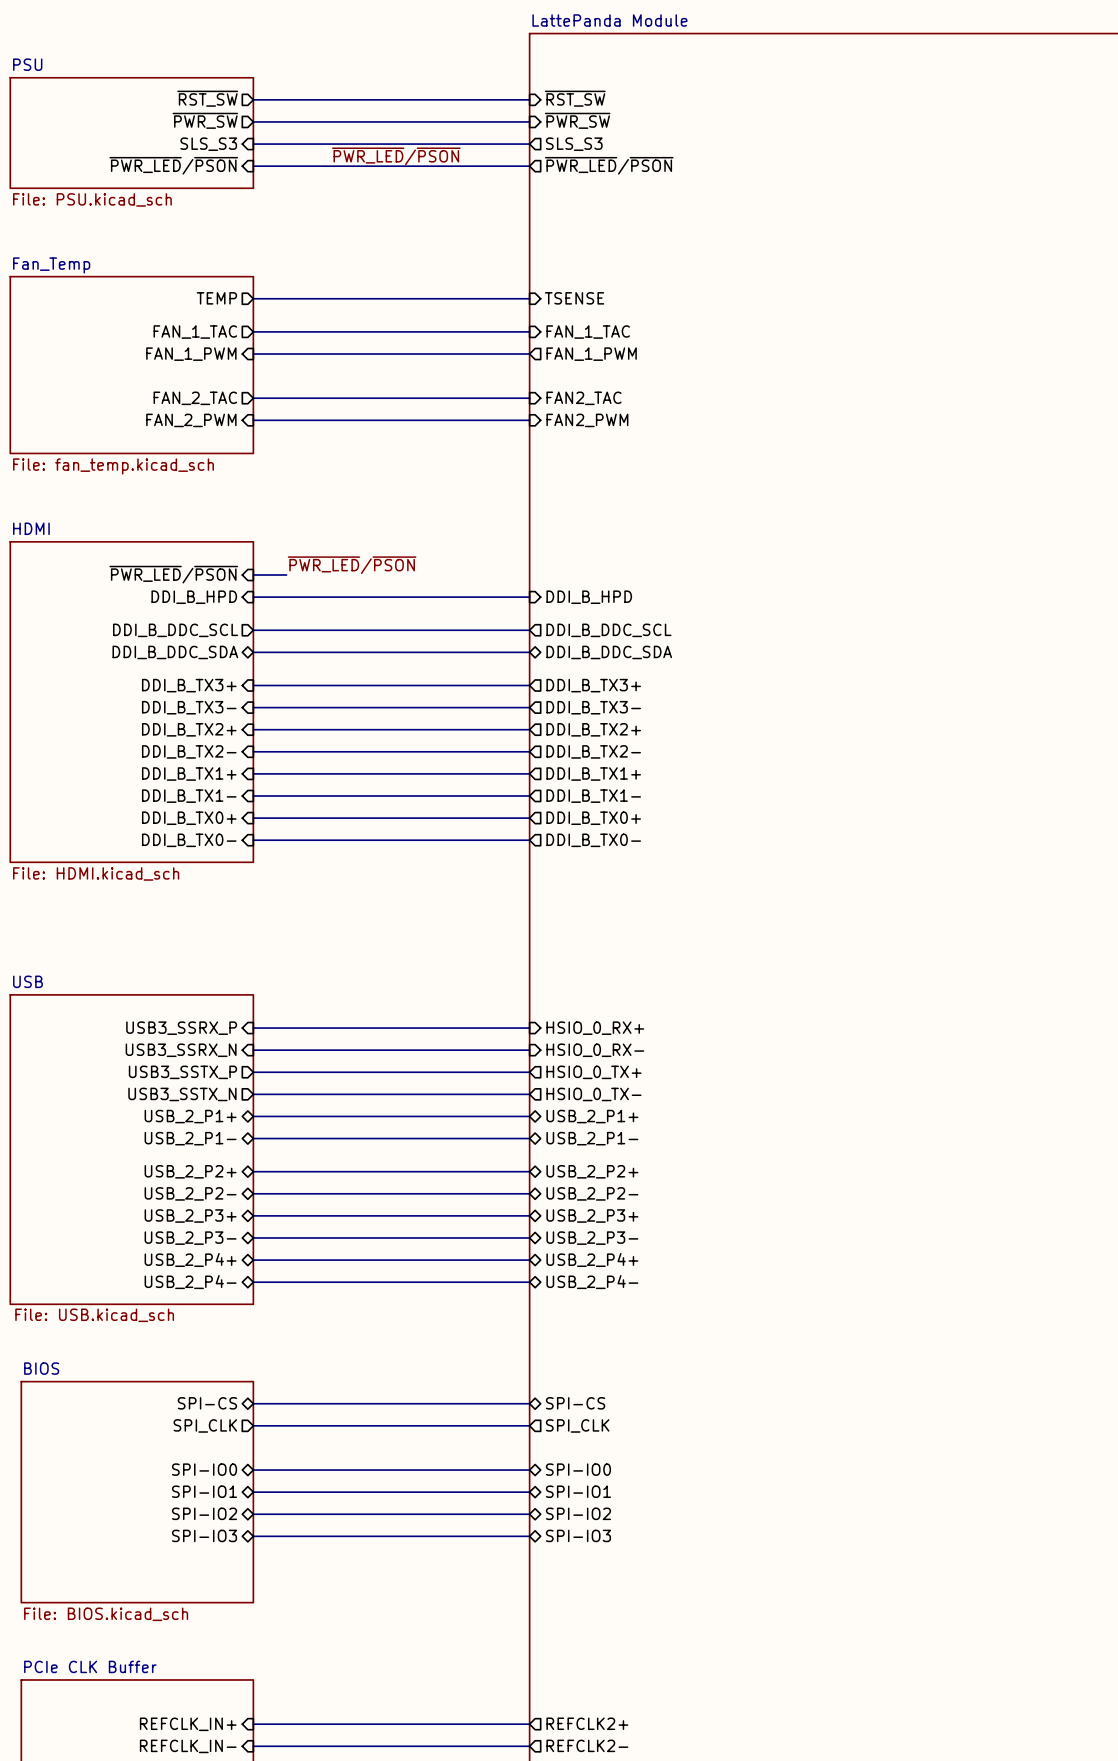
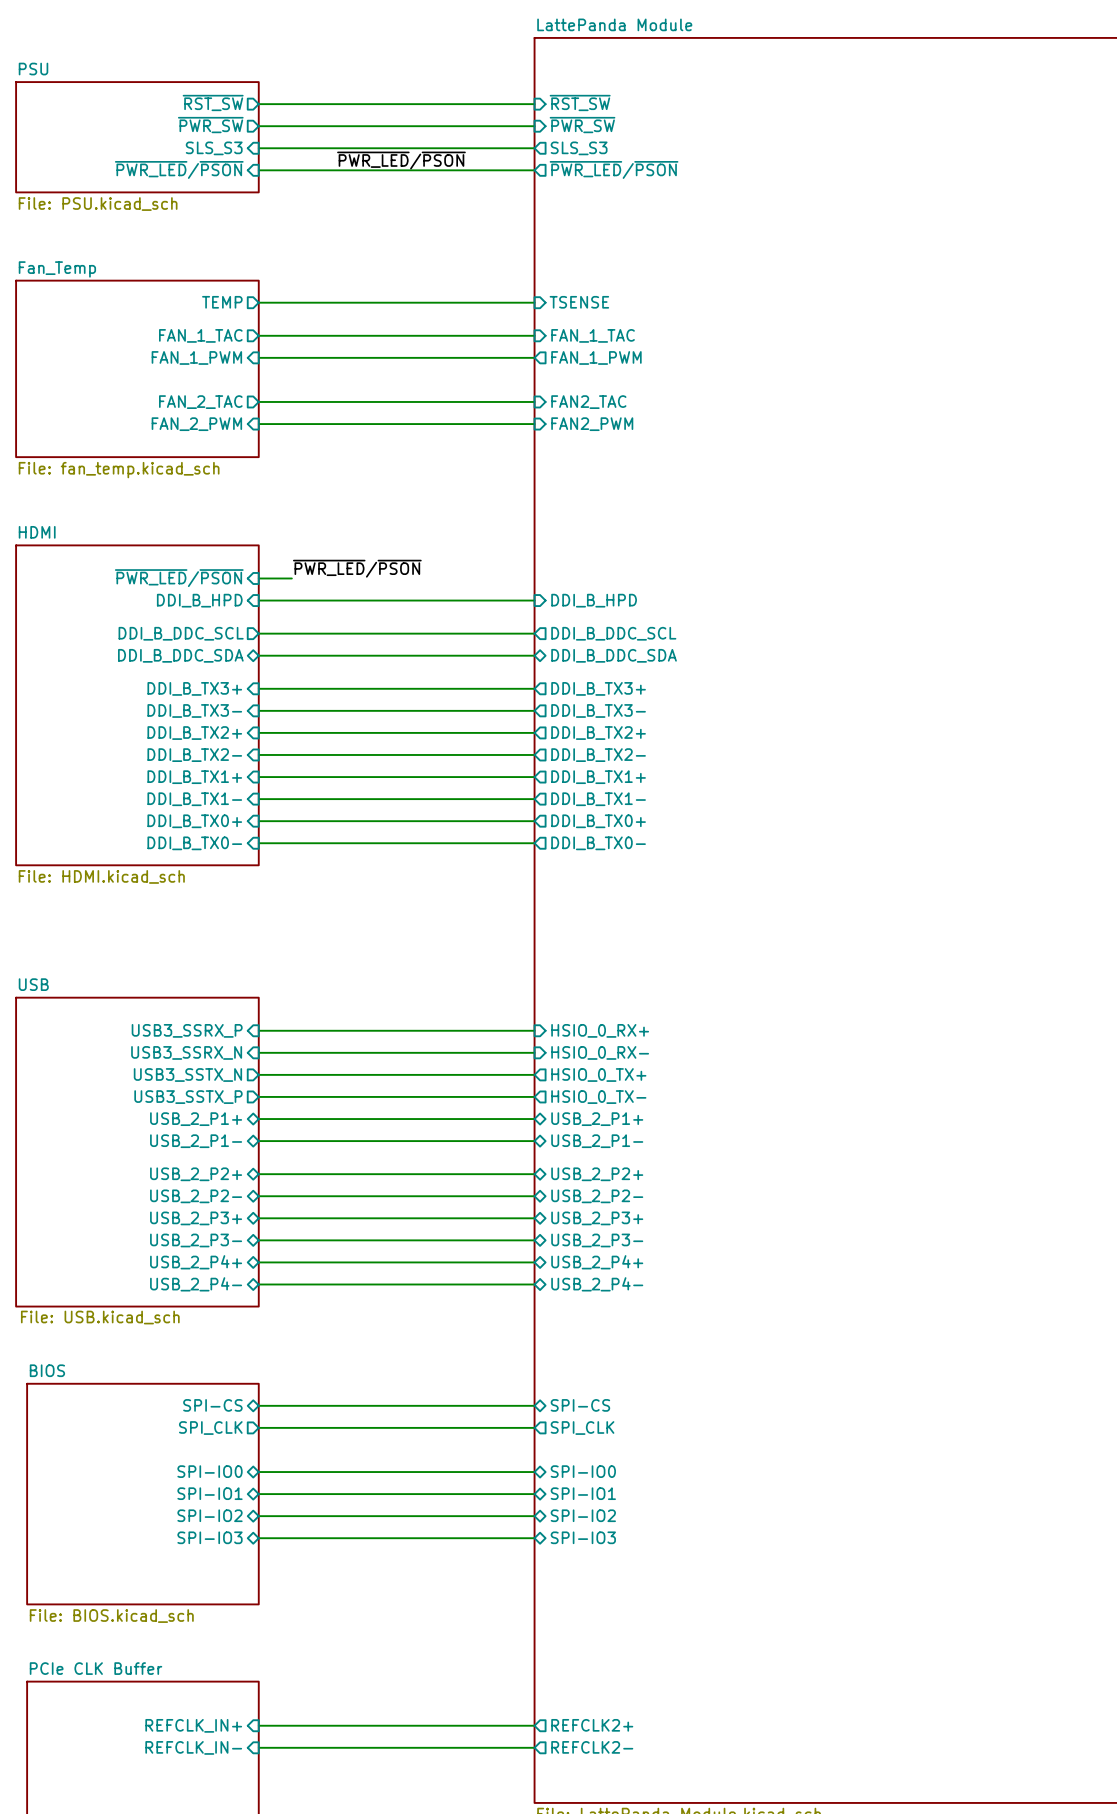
sheet pin: USB3_SSTX_P (182, 1072) -> USB3_SSTX_N (187, 1075)
sheet pin: USB3_SSTX_N (182, 1094) -> USB3_SSTX_P (188, 1097)

